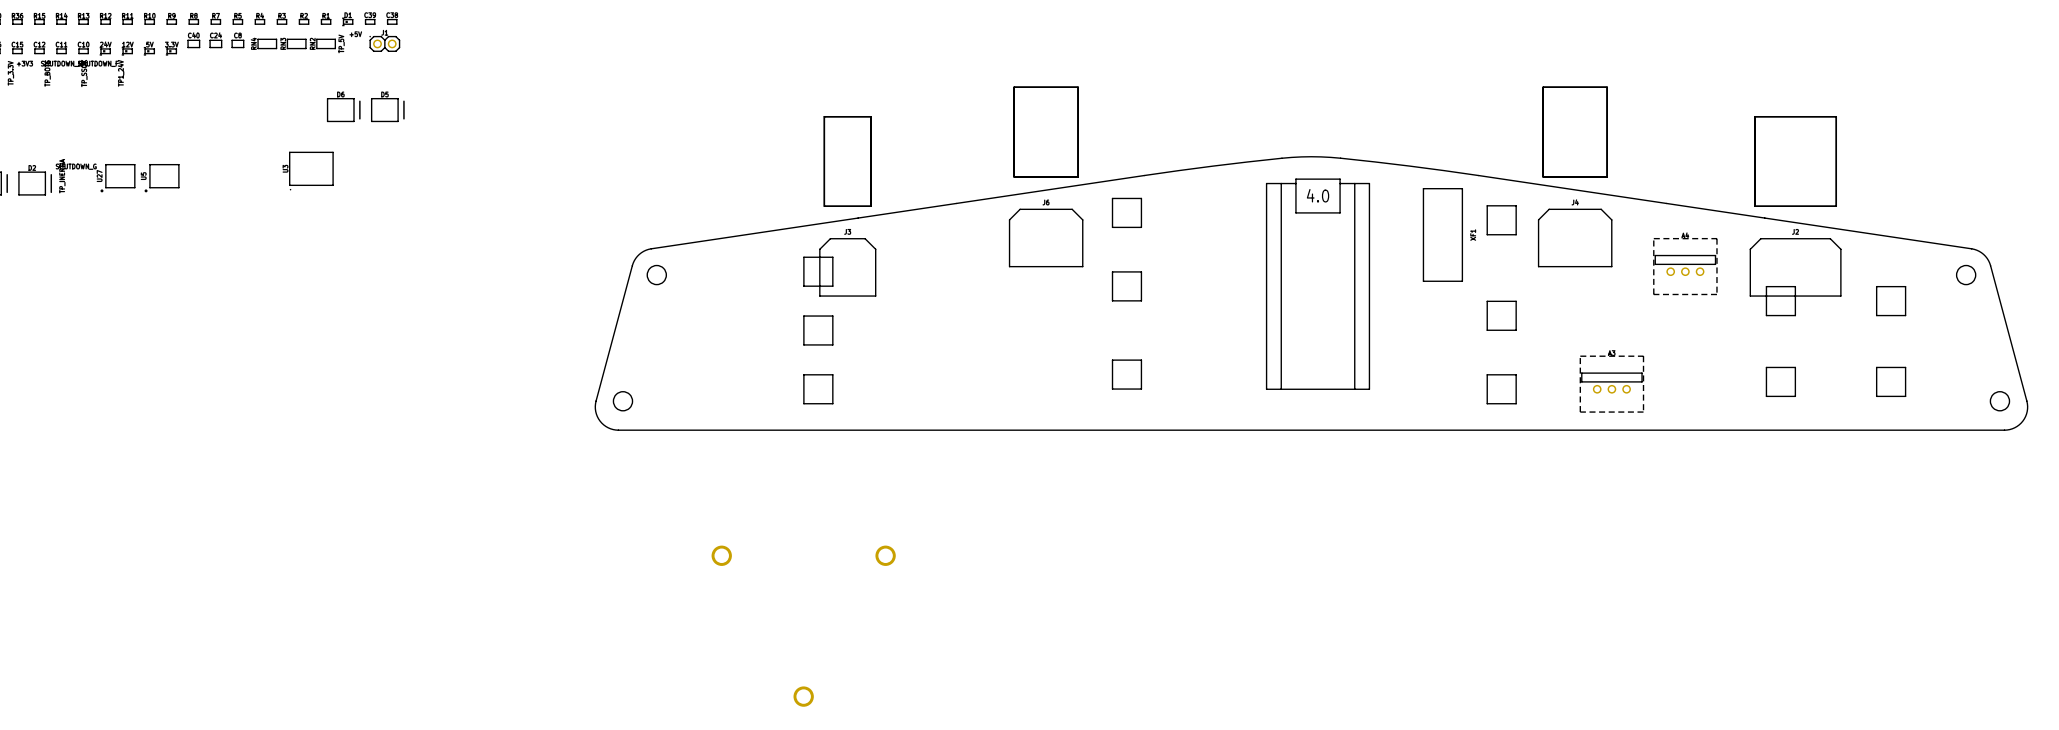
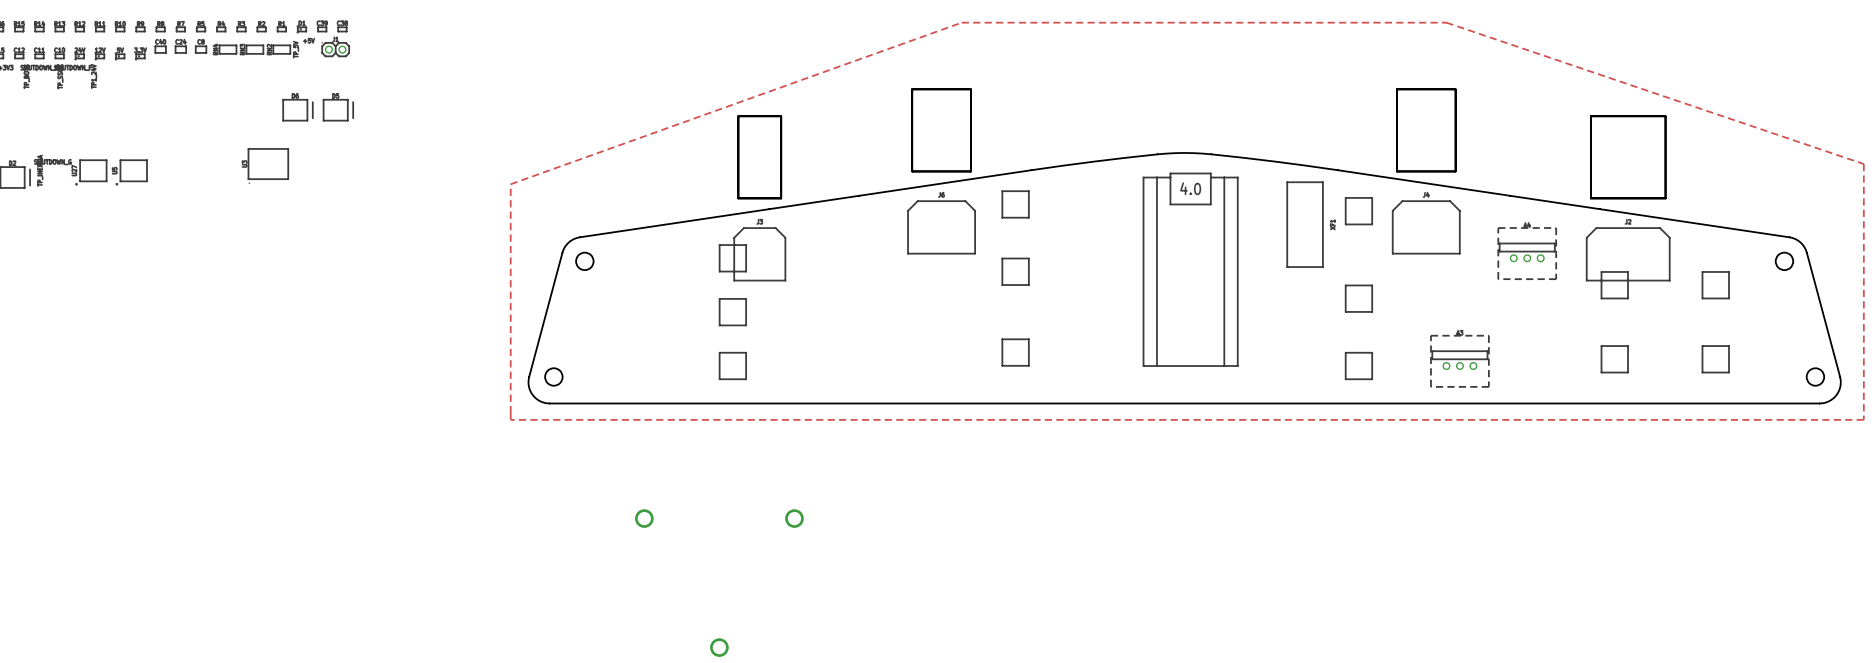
zone outline: none -> (961, 22) (510, 184) (510, 419) (1863, 419) (1863, 164) (1446, 22) (961, 22)

